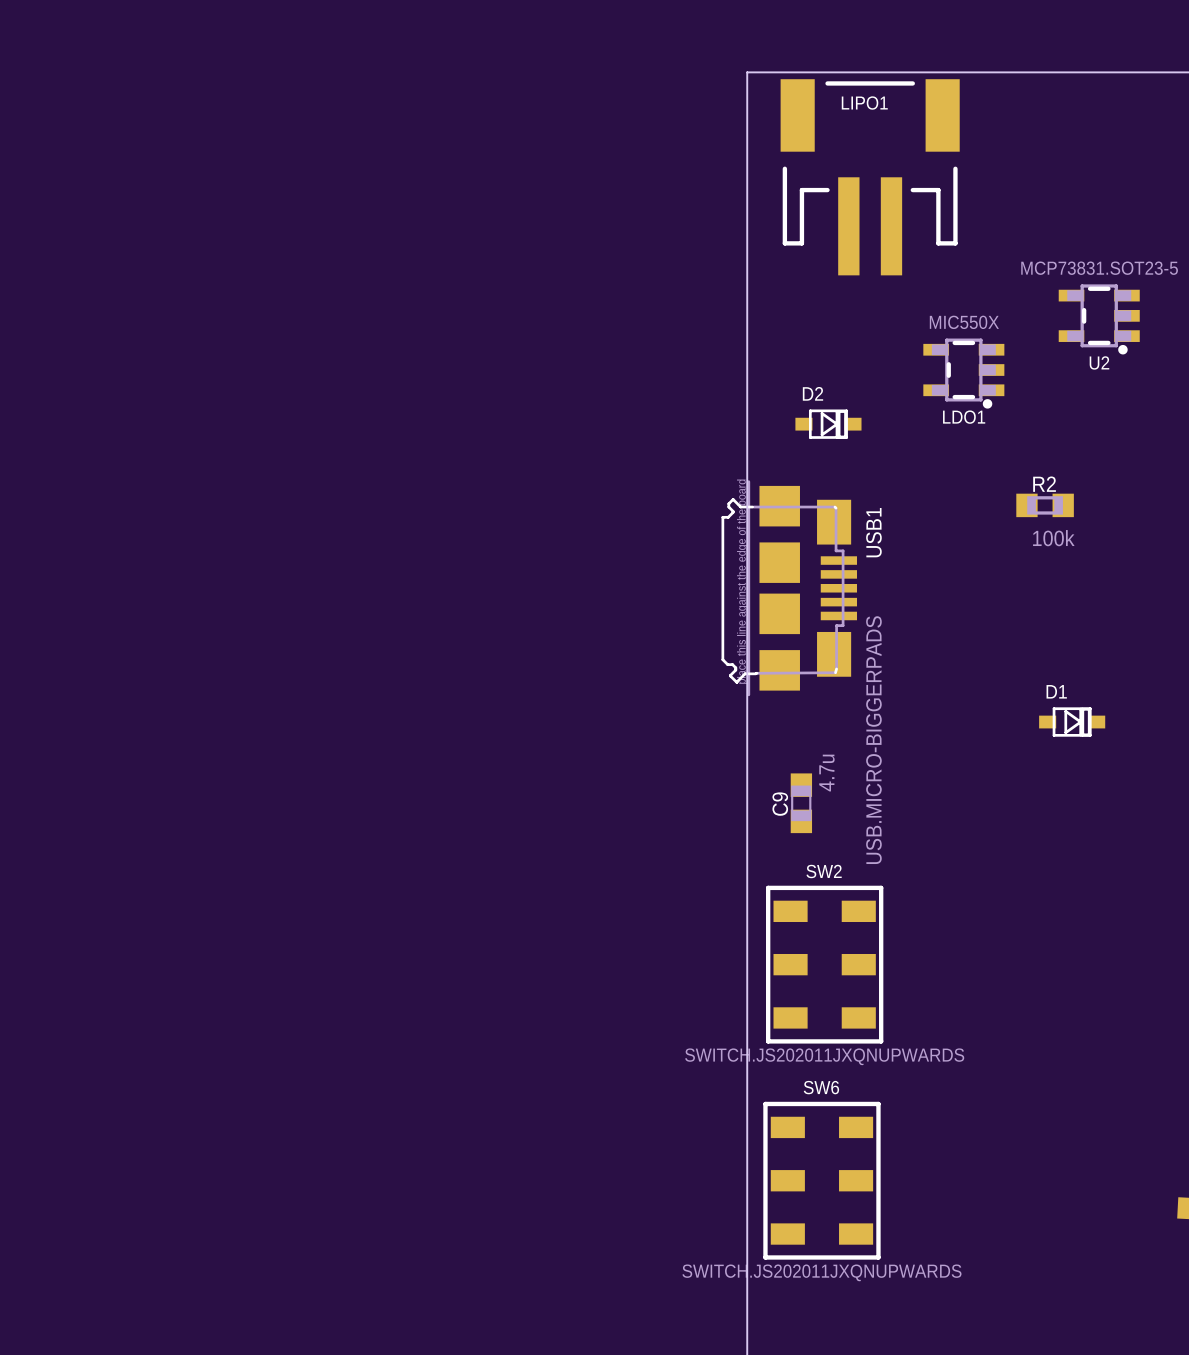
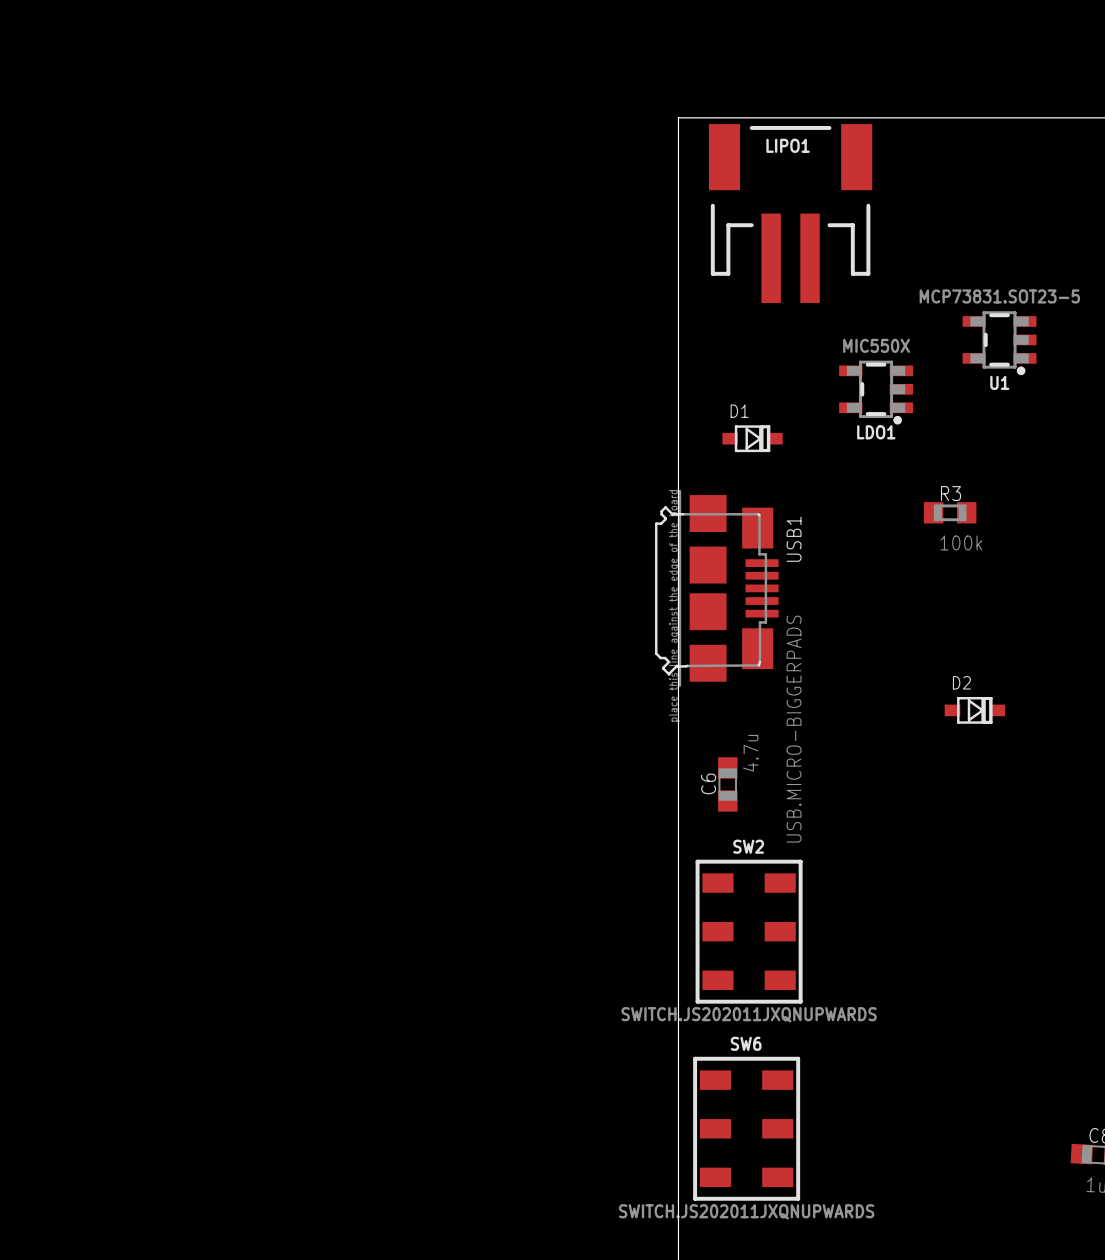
U2 name: U2 (1099, 362) -> U1 (999, 382)
D2 name: D2 (812, 393) -> D1 (739, 411)
R2 name: R2 (1044, 484) -> R3 (950, 493)
D1 name: D1 (1056, 691) -> D2 (961, 682)
C9 name: C9 (780, 804) -> C6 (708, 783)

